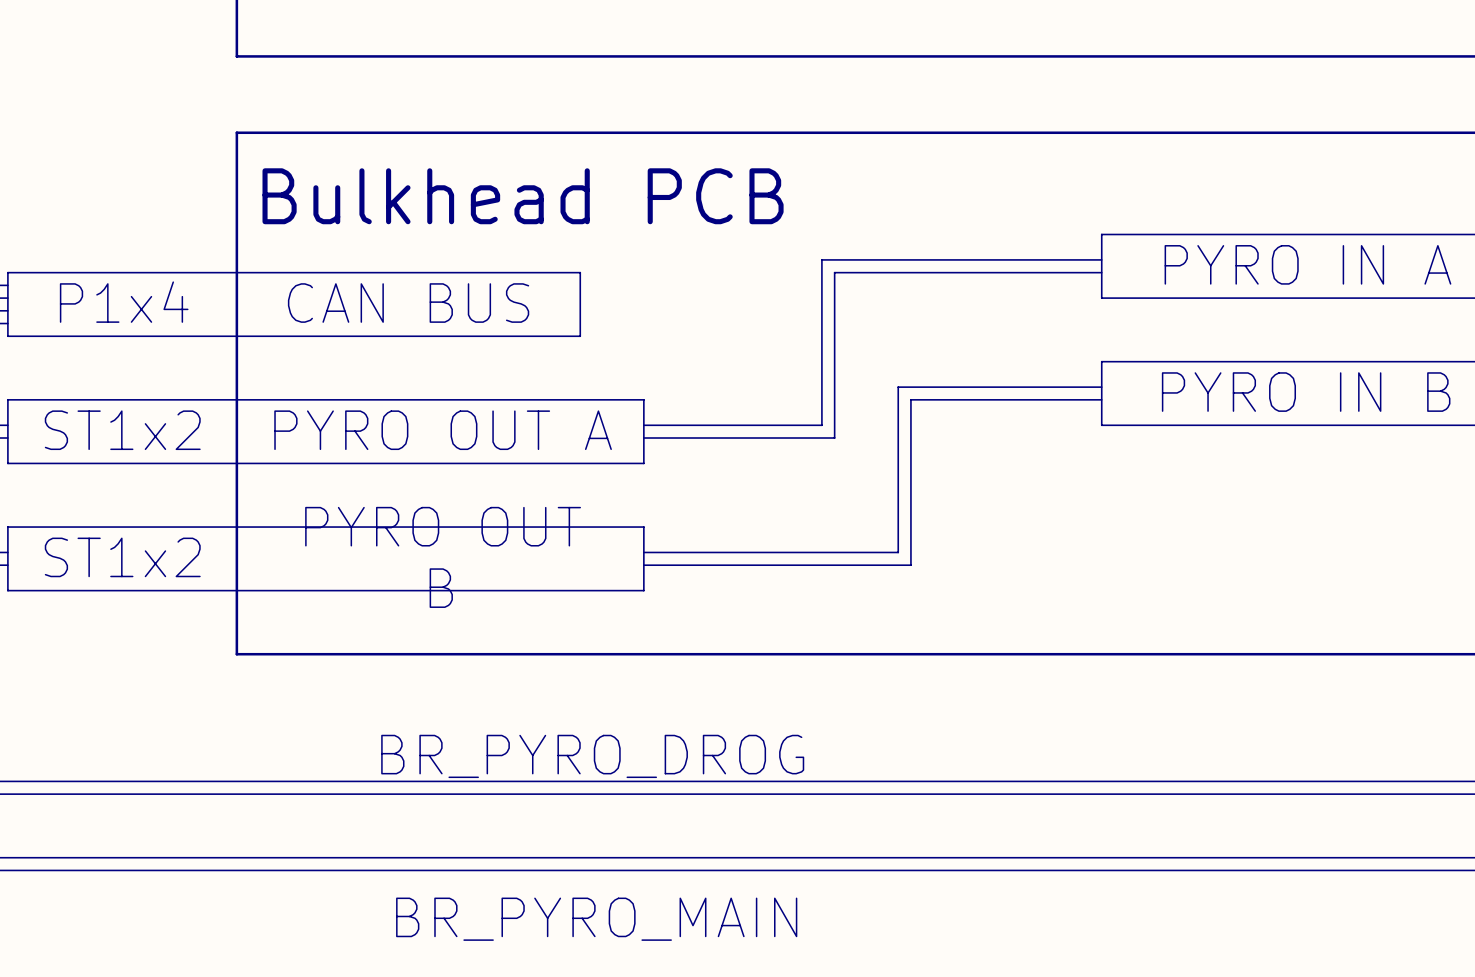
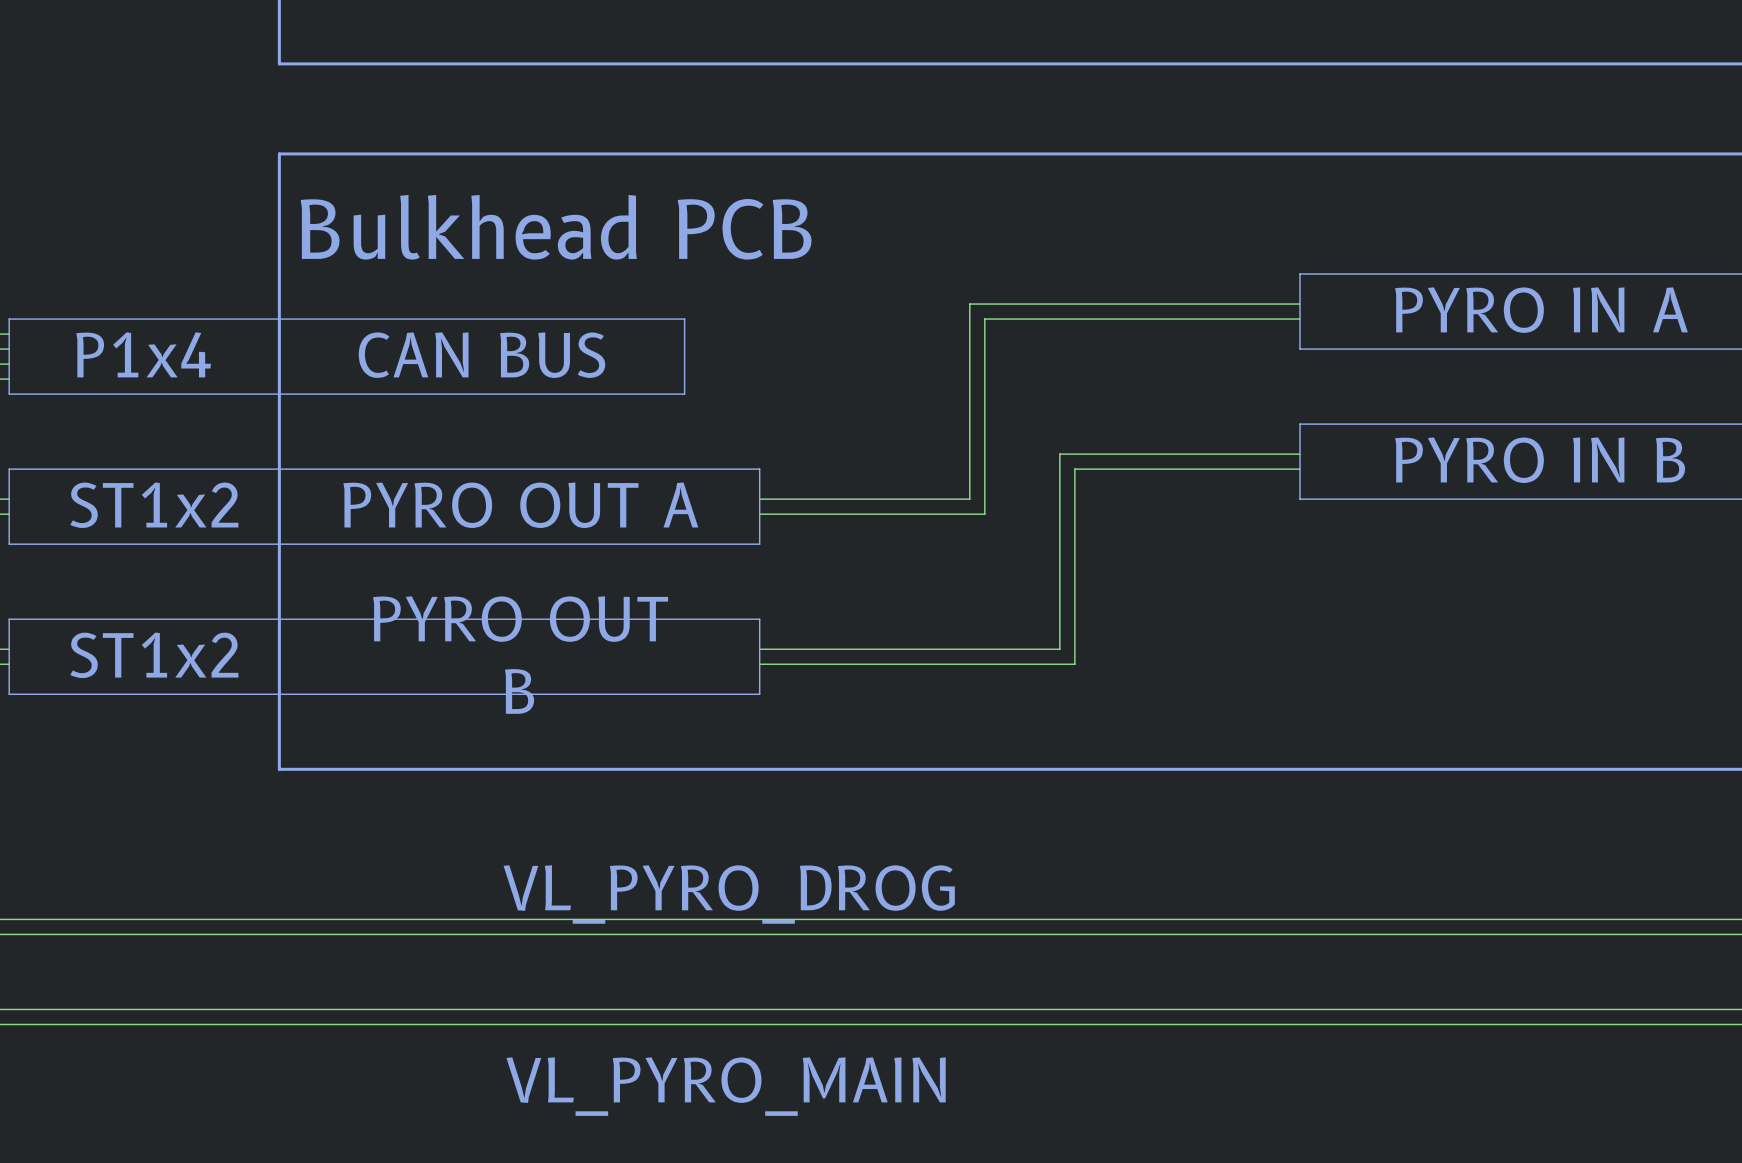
text: BR_PYRO_DROG (592, 756) -> VL_PYRO_DROG (729, 894)
text: BR_PYRO_MAIN (596, 919) -> VL_PYRO_MAIN (726, 1086)

